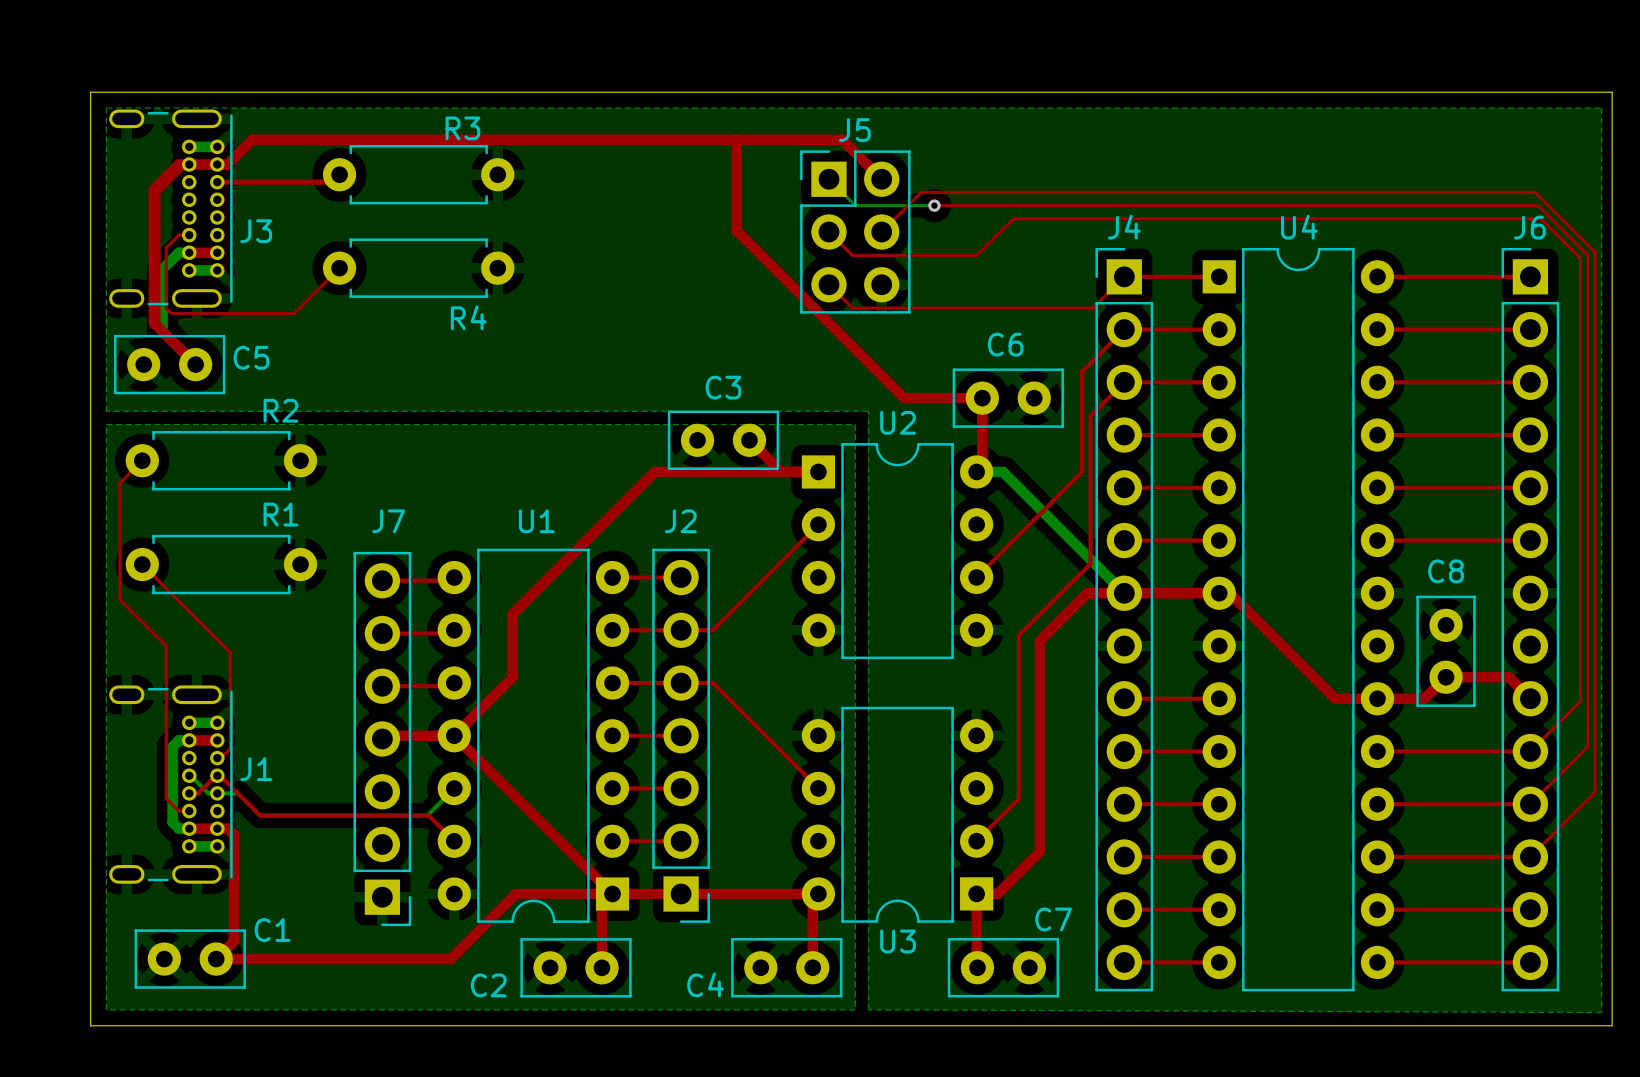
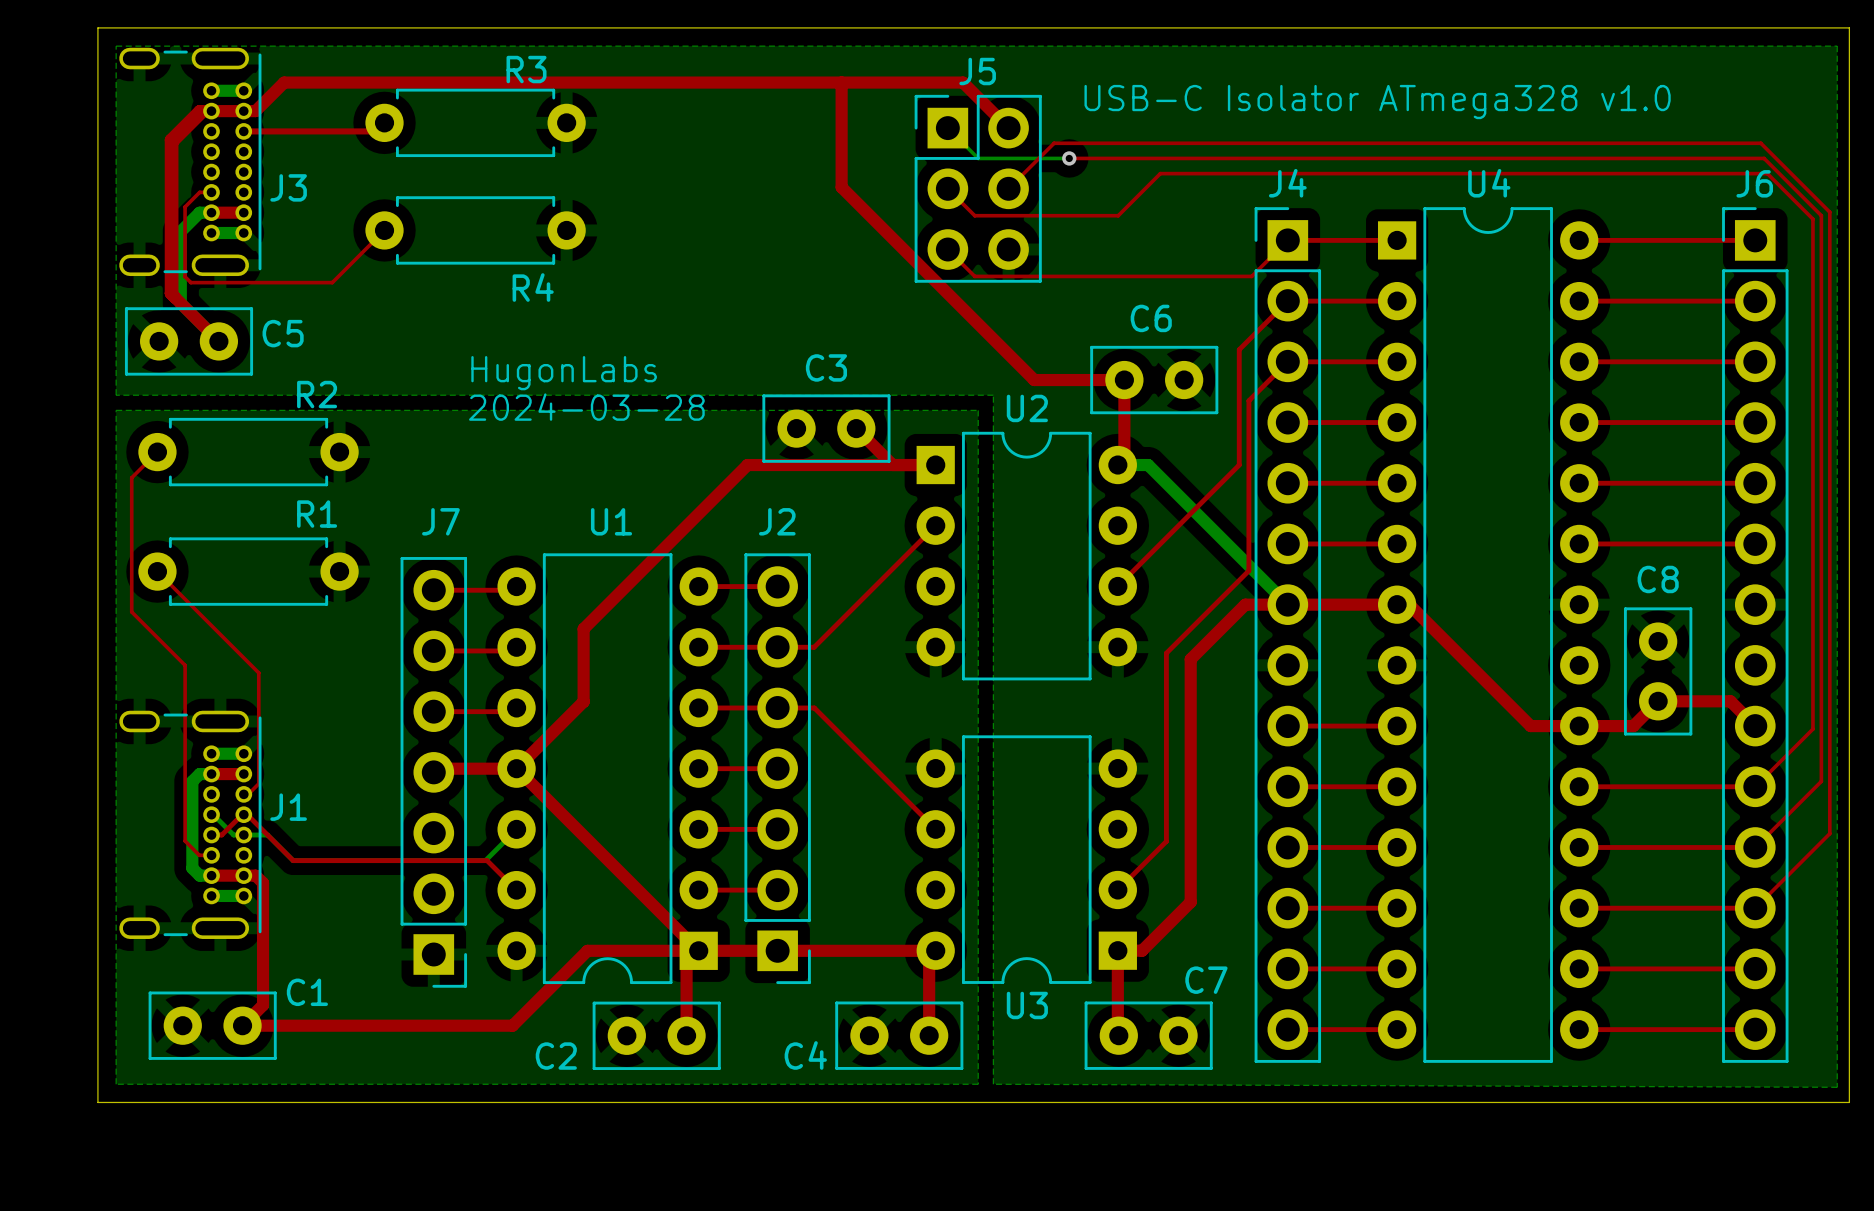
text: none -> USB-C Isolator ATmega328 v1.0 (1377, 102)
text: none -> HugonLabs (564, 373)
text: none -> 2024-03-28 (586, 407)

